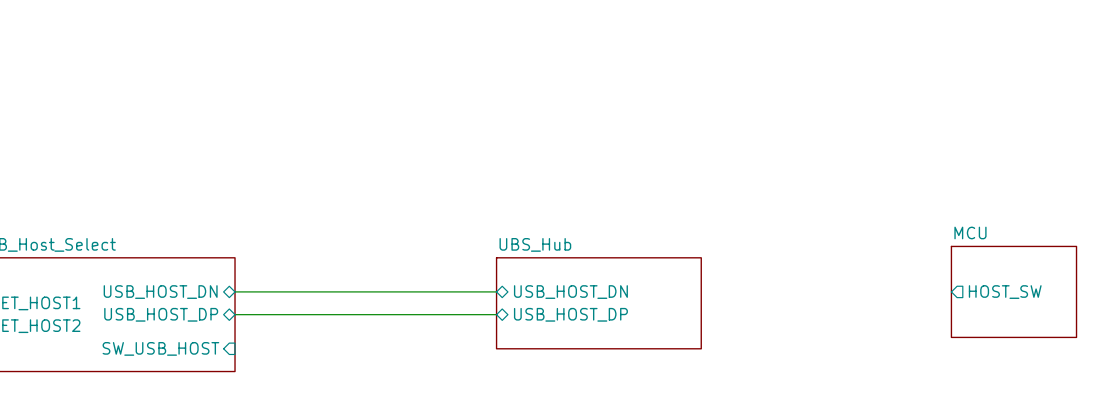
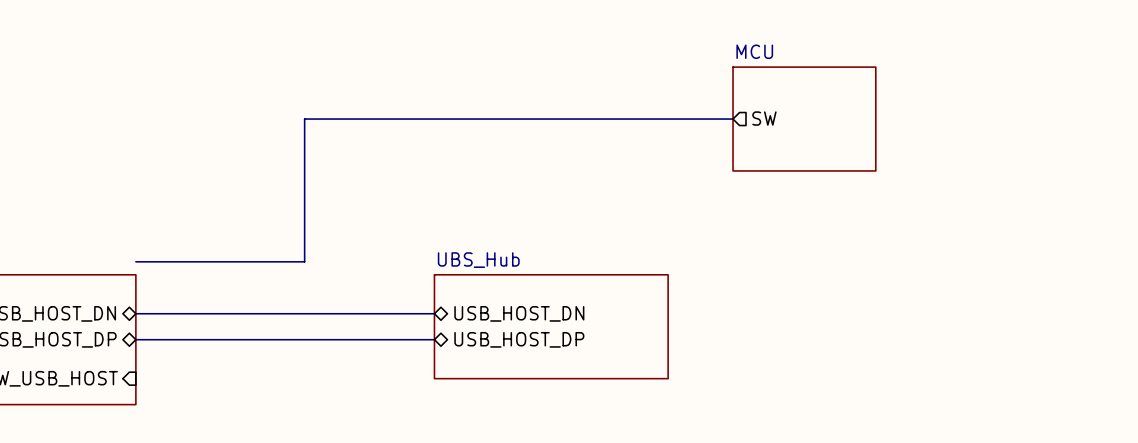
sheet pin: none -> SW (764, 118)
wire: none -> (733, 119) (304, 119) (304, 261) (135, 261)
sheet MCU: none -> (804, 119)
sheet MCU: (1013, 291) -> none
sheet pin: HOST_SW (1005, 292) -> none

